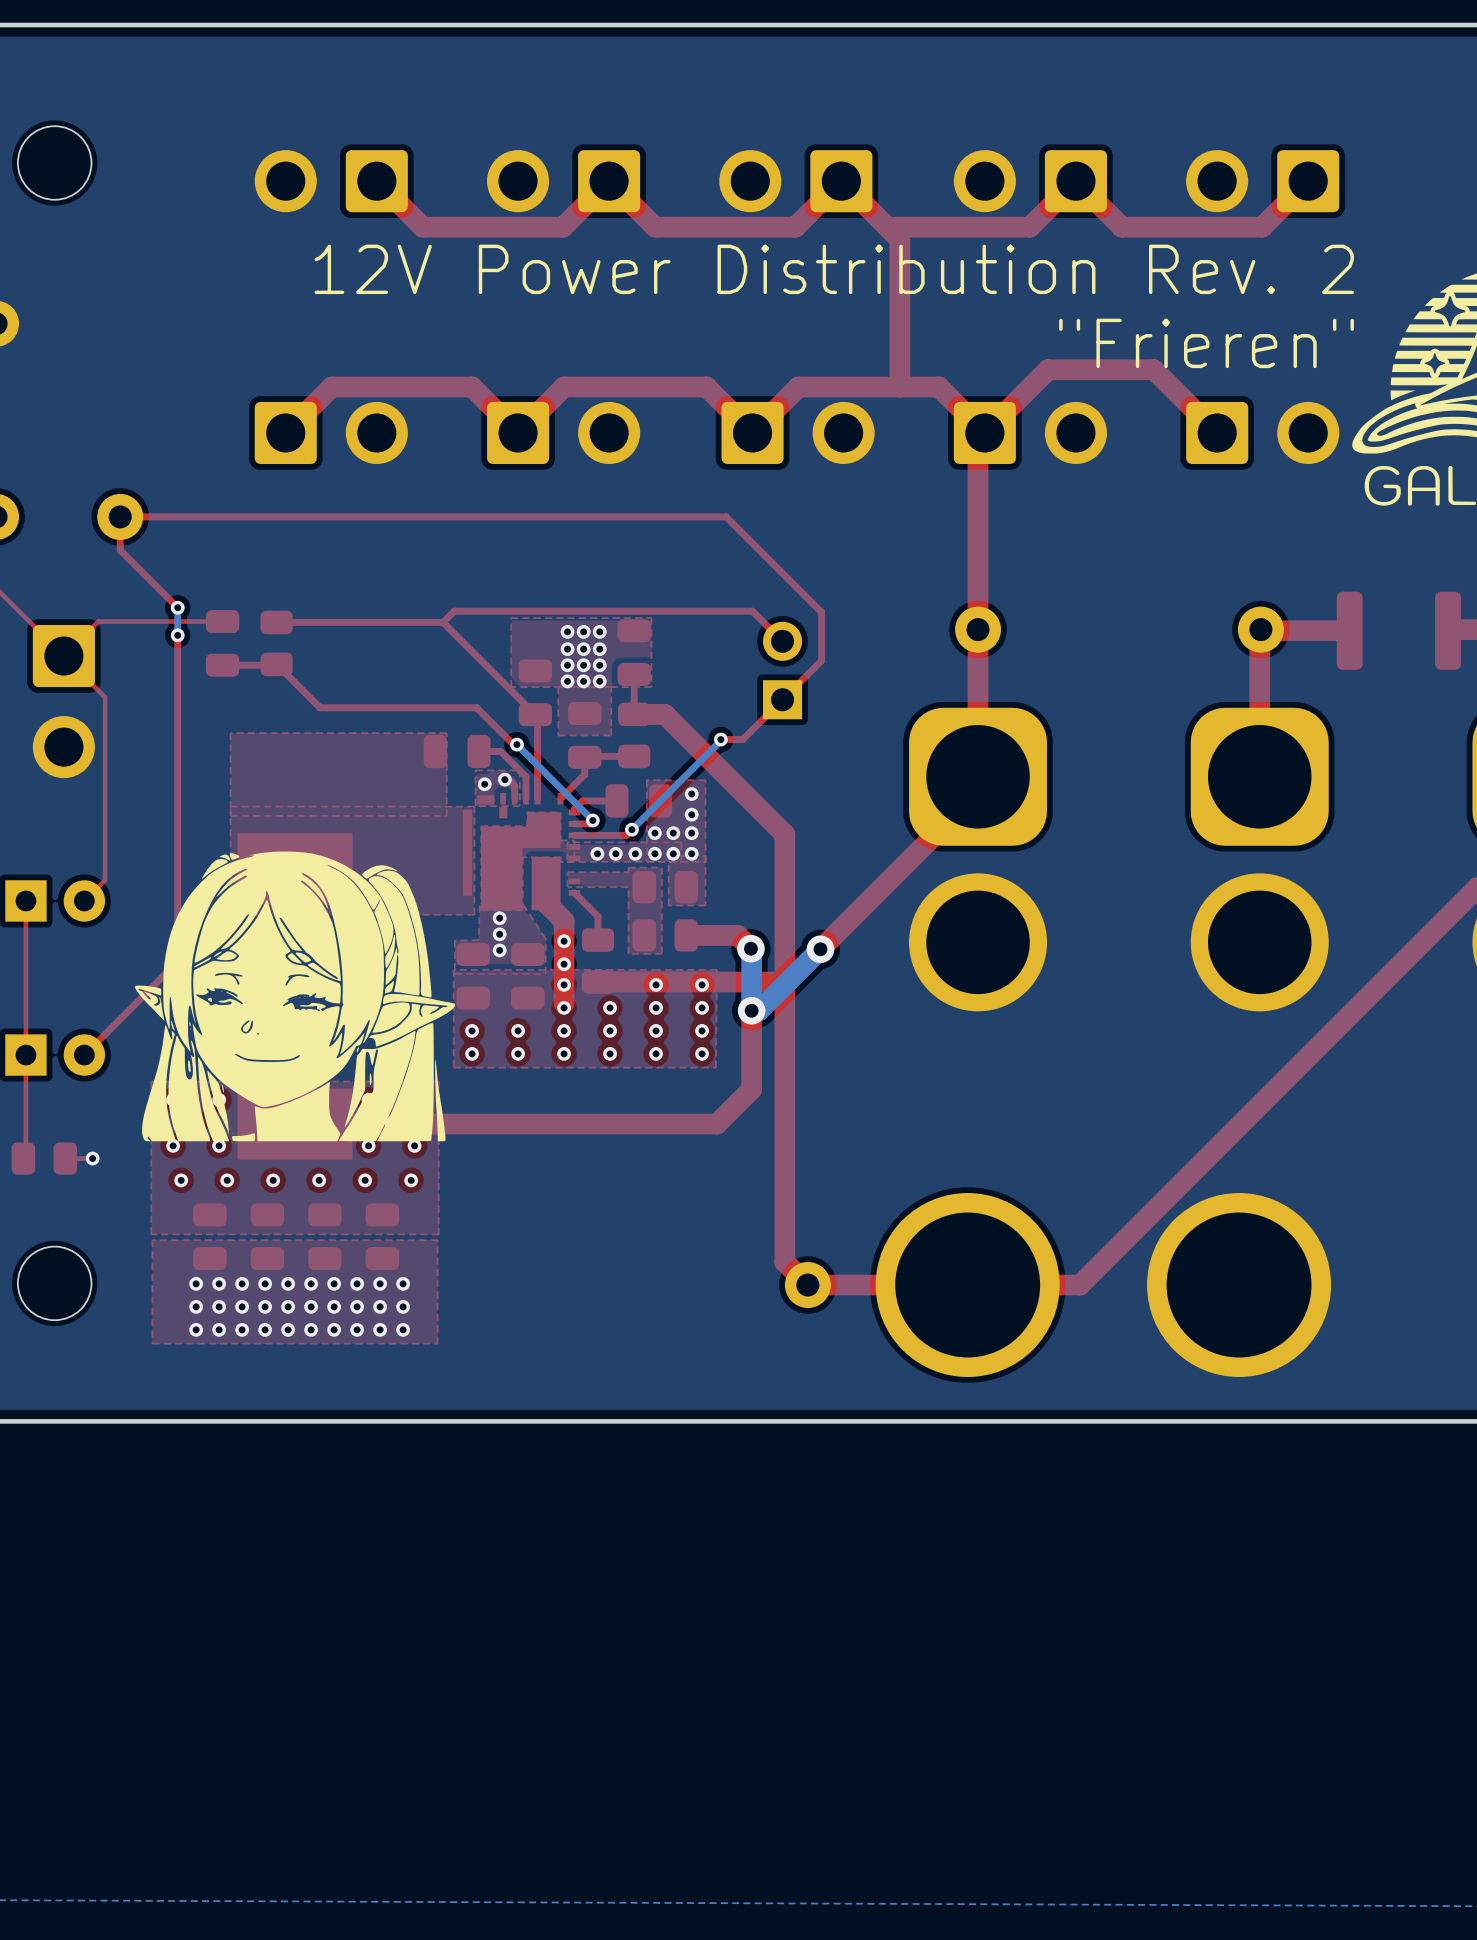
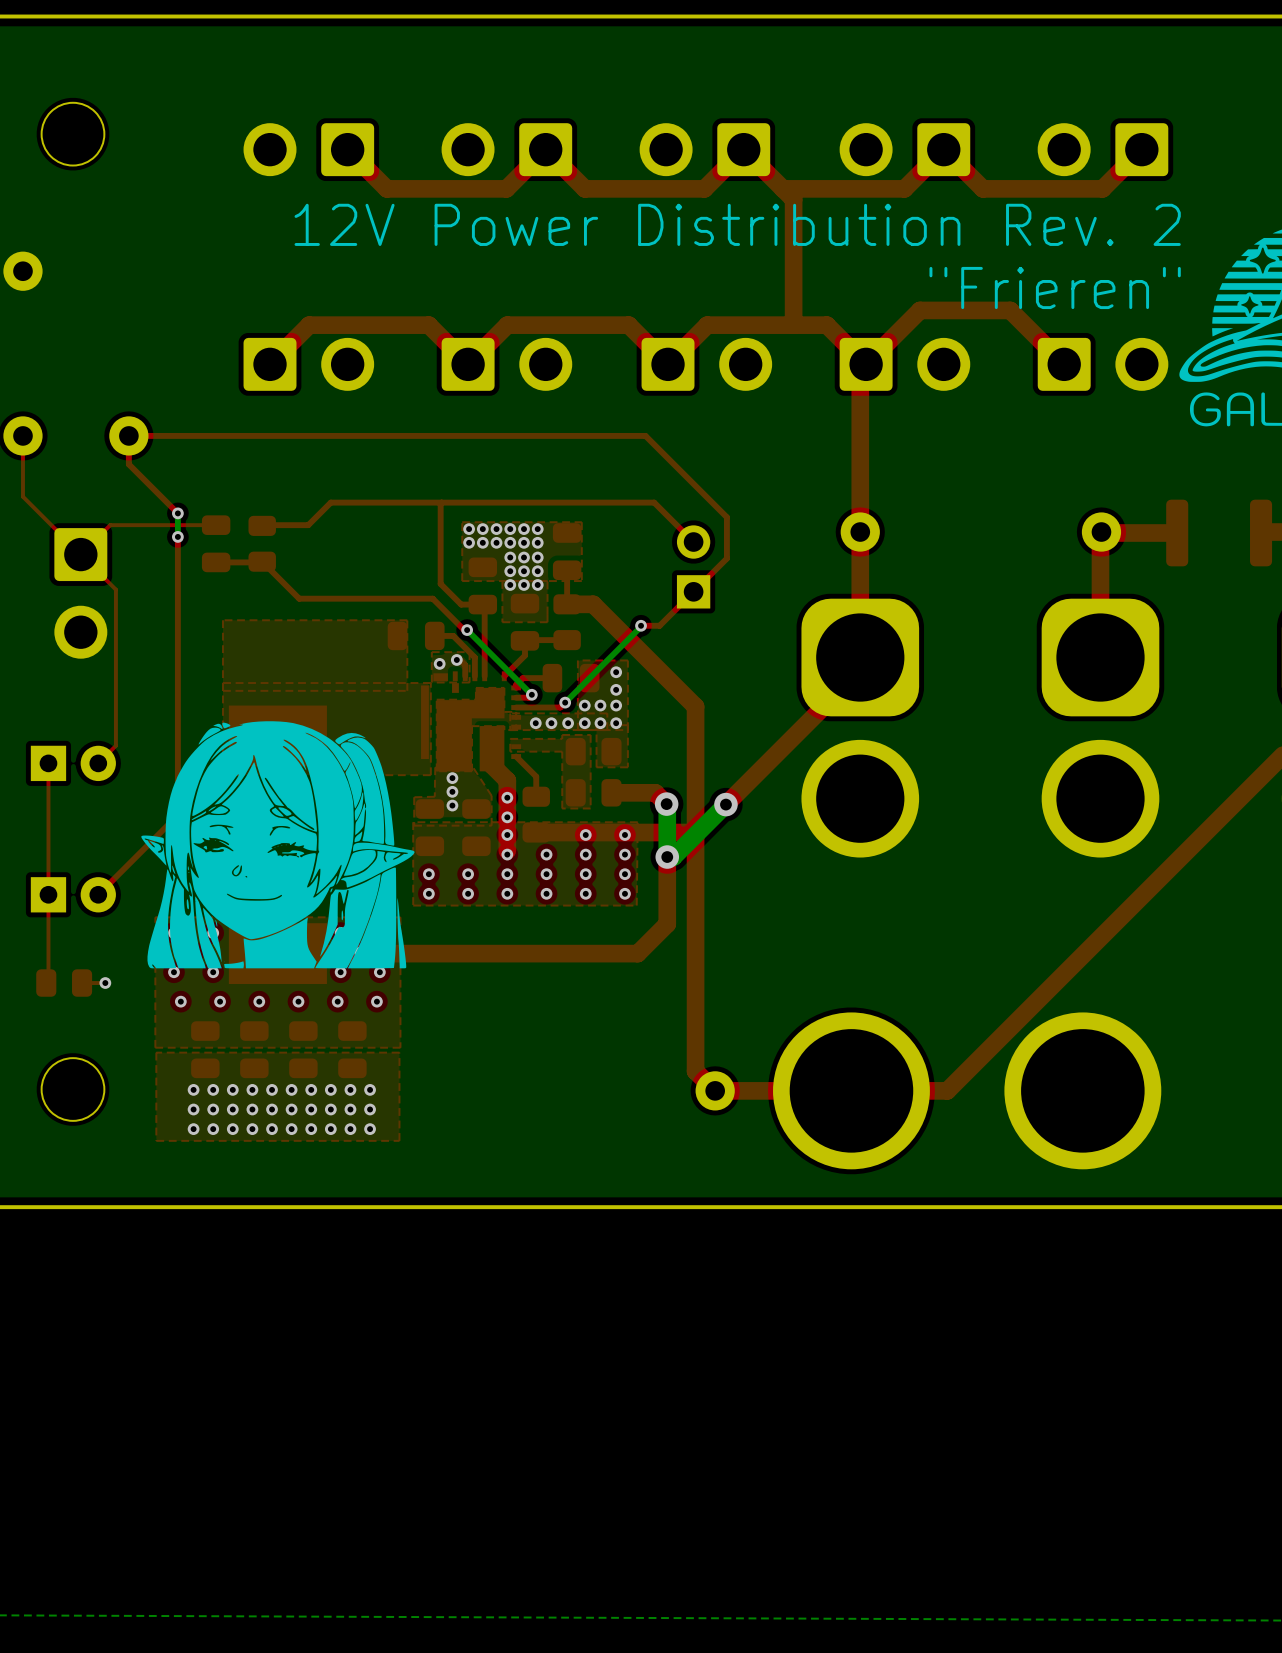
top track: (752, 611) (454, 611) (443, 622) -> (667, 516) (654, 502) (330, 502) (308, 525) (262, 525)
top track: (443, 622) (535, 714) -> (441, 502) (440, 583) (461, 604) (482, 604)
top track: (443, 622) (276, 622) -> none
via: none -> (469, 529)
via: none -> (482, 529)
via: none -> (496, 529)
via: none -> (510, 529)
via: none -> (523, 529)
via: none -> (537, 529)
via: (567, 631) -> none
via: (583, 631) -> none
via: (599, 631) -> none
via: none -> (469, 542)
via: none -> (482, 542)
via: none -> (496, 542)
via: none -> (510, 542)
via: none -> (523, 542)
via: none -> (537, 542)
via: (567, 649) -> none
via: (583, 649) -> none
via: (599, 649) -> none
via: none -> (510, 557)
via: none -> (523, 557)
via: none -> (537, 557)
via: (567, 665) -> none
via: (583, 665) -> none
via: (599, 665) -> none
via: none -> (510, 571)
via: none -> (523, 571)
via: none -> (537, 571)
via: (567, 681) -> none
via: (583, 681) -> none
via: (599, 681) -> none
via: none -> (510, 584)
via: none -> (523, 584)
via: none -> (537, 584)

